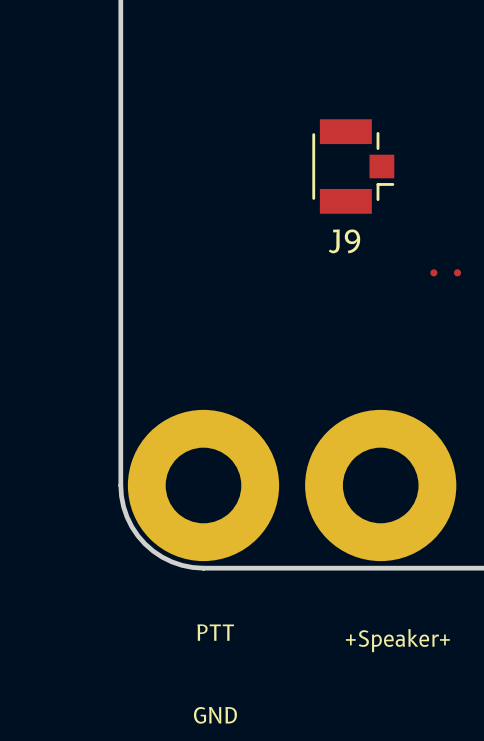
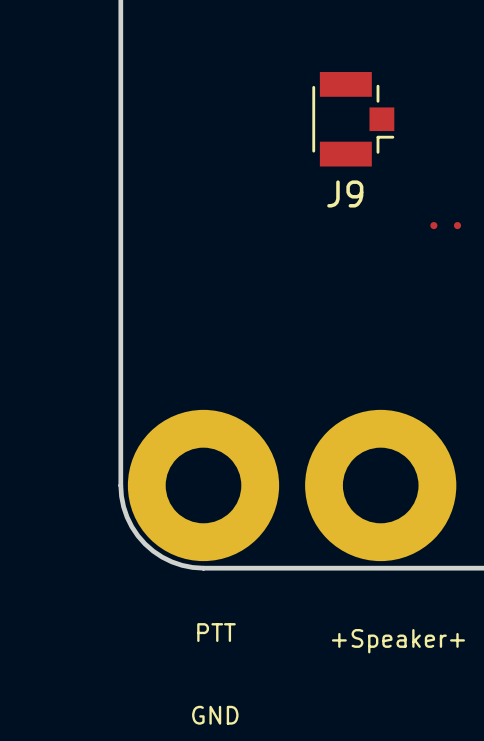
J9 position: (353, 166) -> (353, 119)
part position: (445, 272) -> (445, 225)

